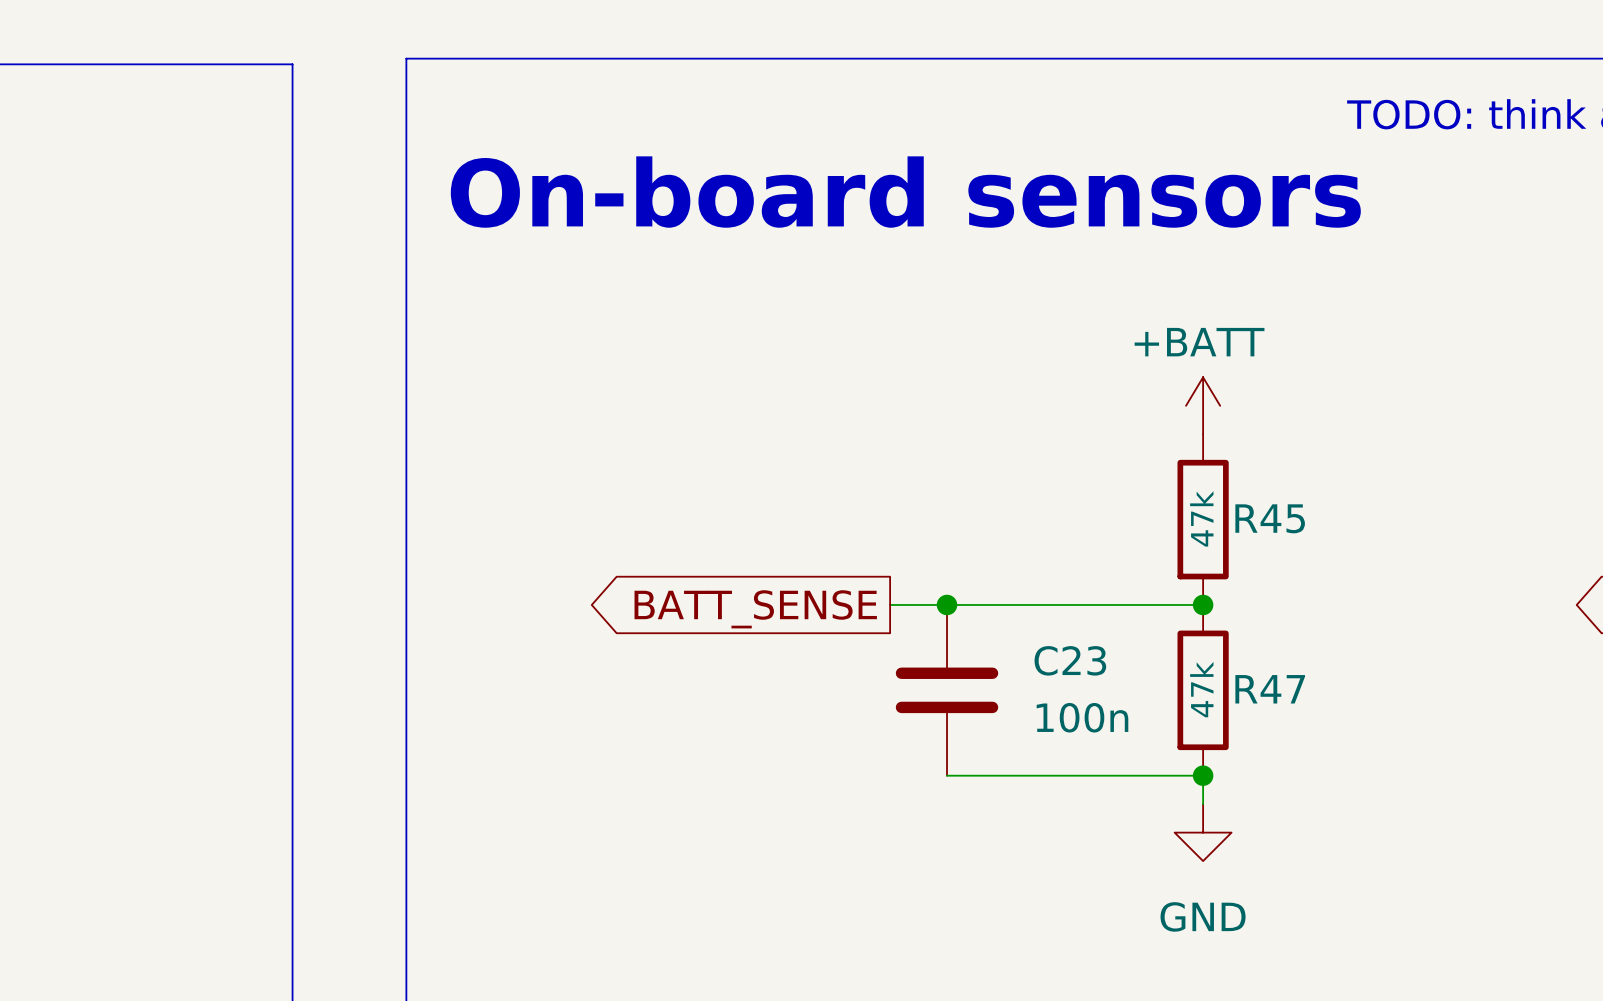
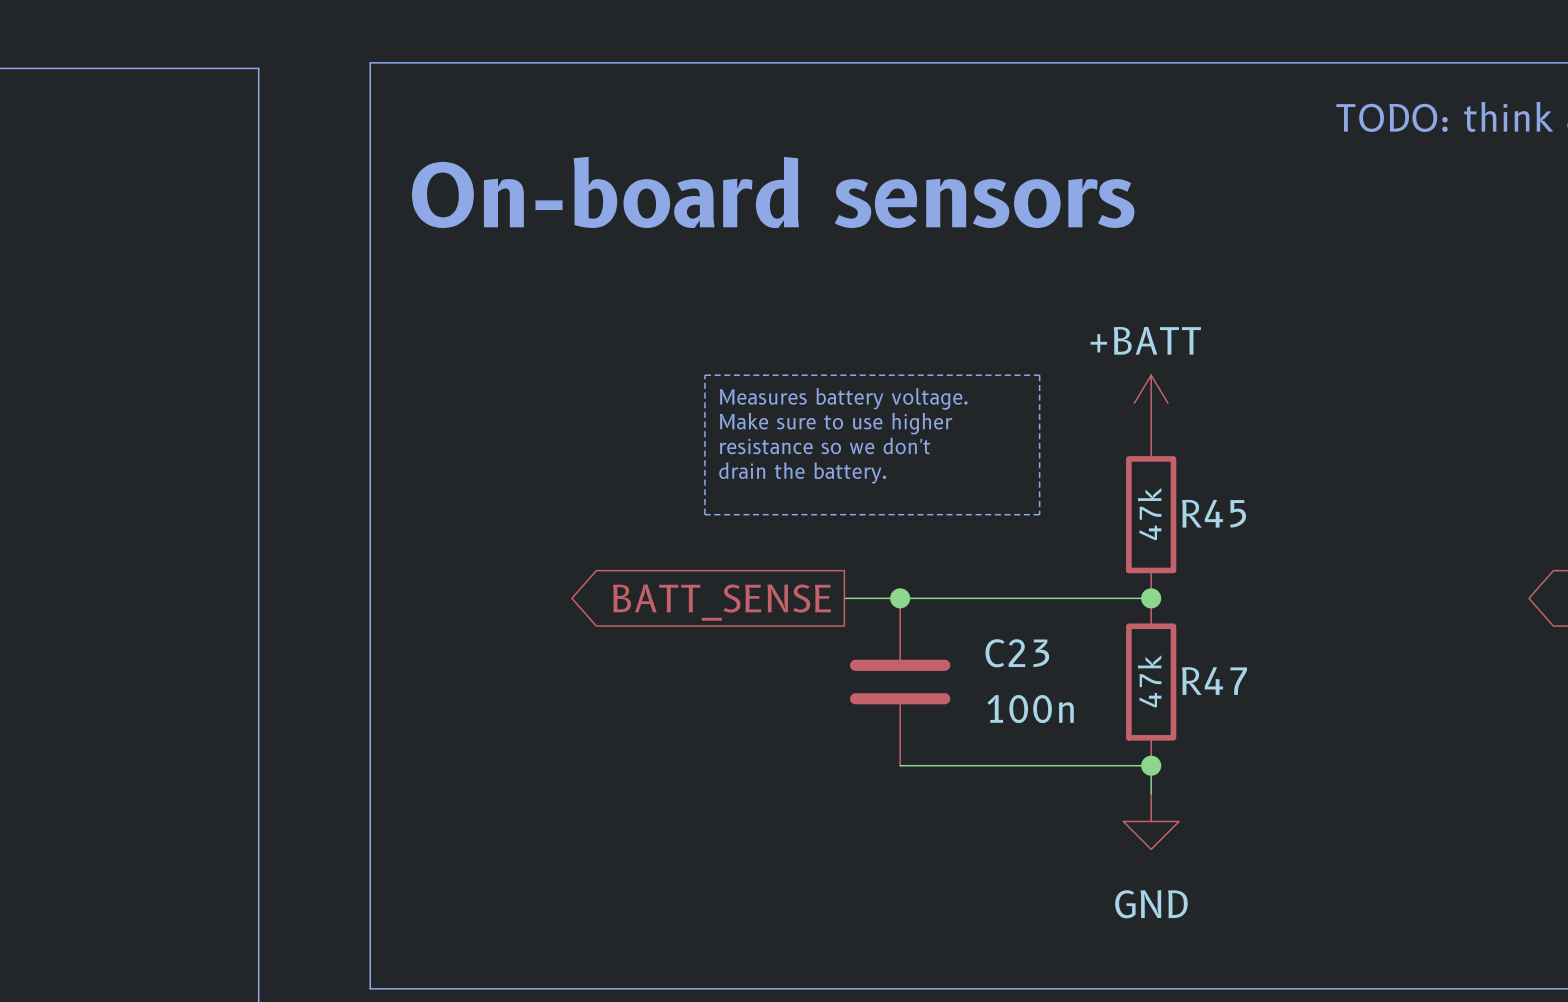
line: none -> (704, 375) (1039, 375) (1039, 514) (704, 514) (704, 375)
text: none -> Measures battery voltage. (843, 398)
text: none -> Make sure to use higher (836, 423)
text: none -> resistance so we don't (825, 445)
text: none -> drain the battery. (802, 473)

